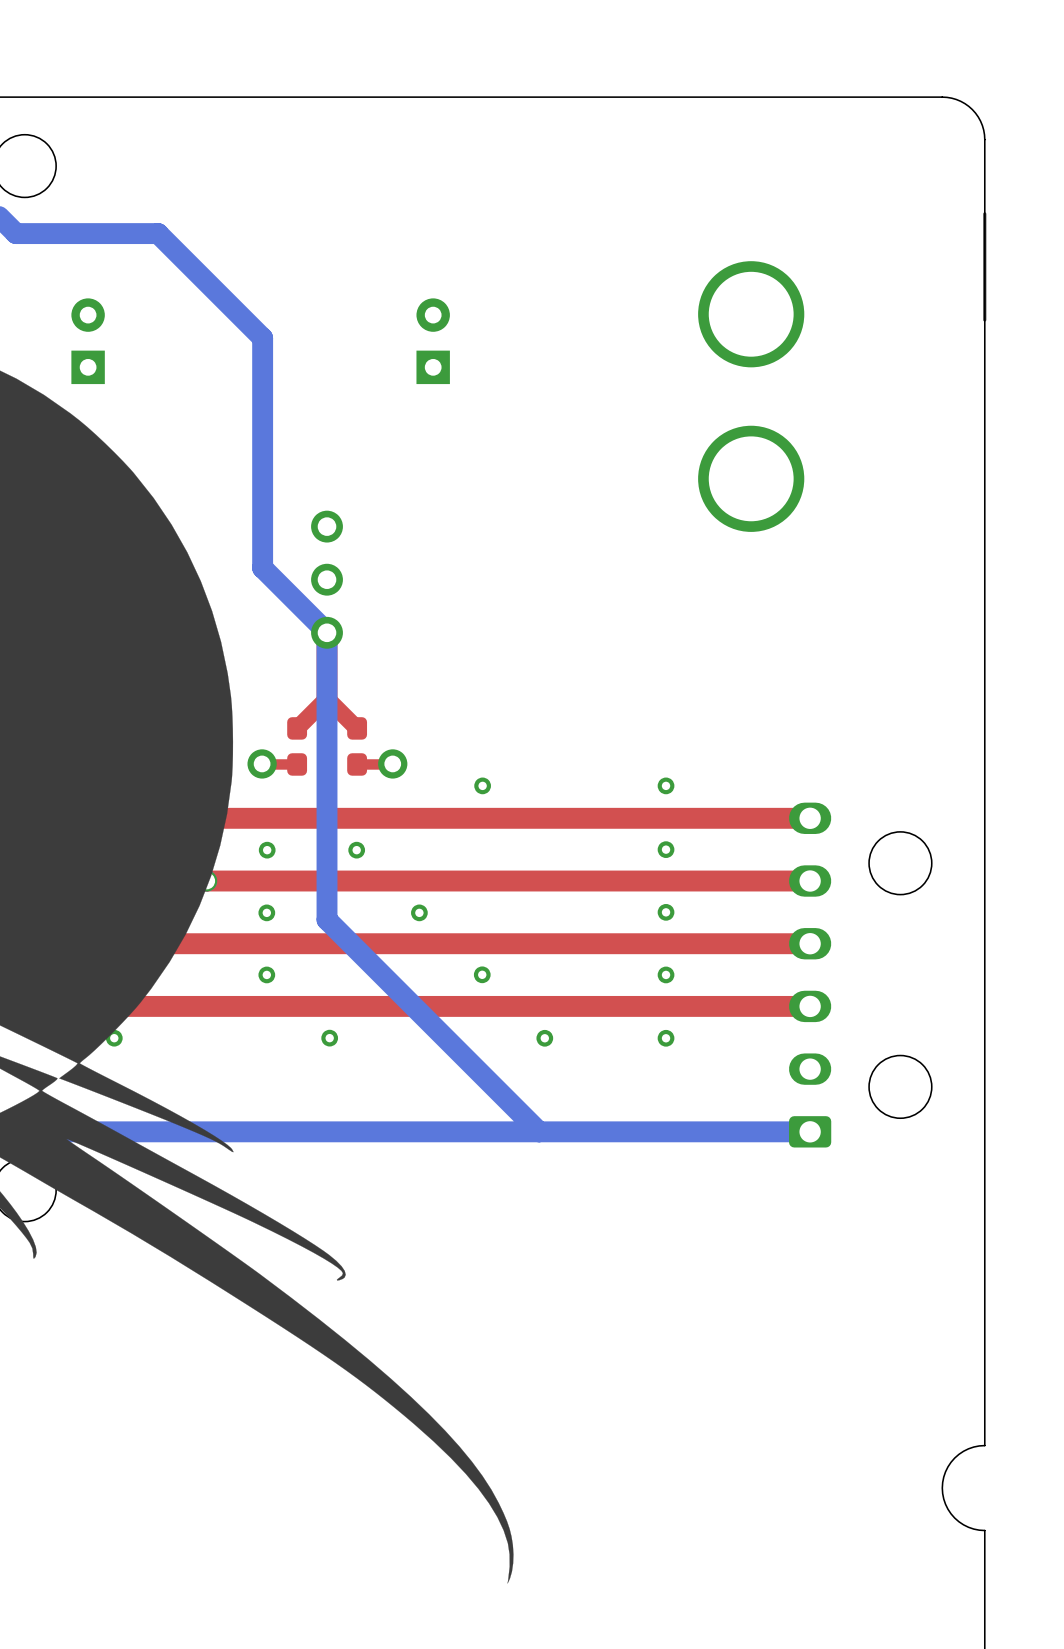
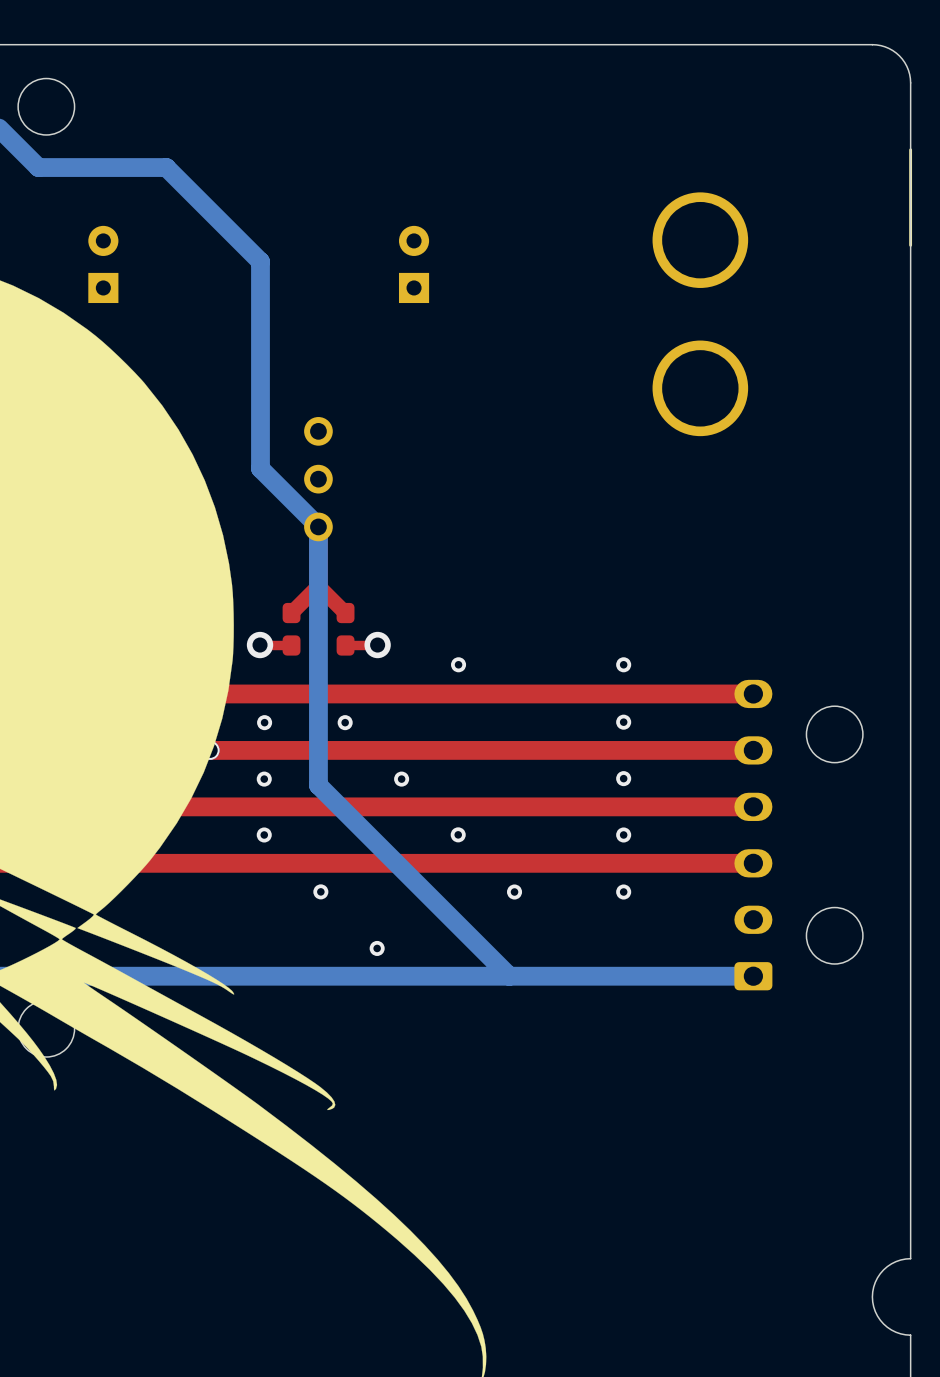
via: (114, 1038) -> none
via: none -> (377, 948)

